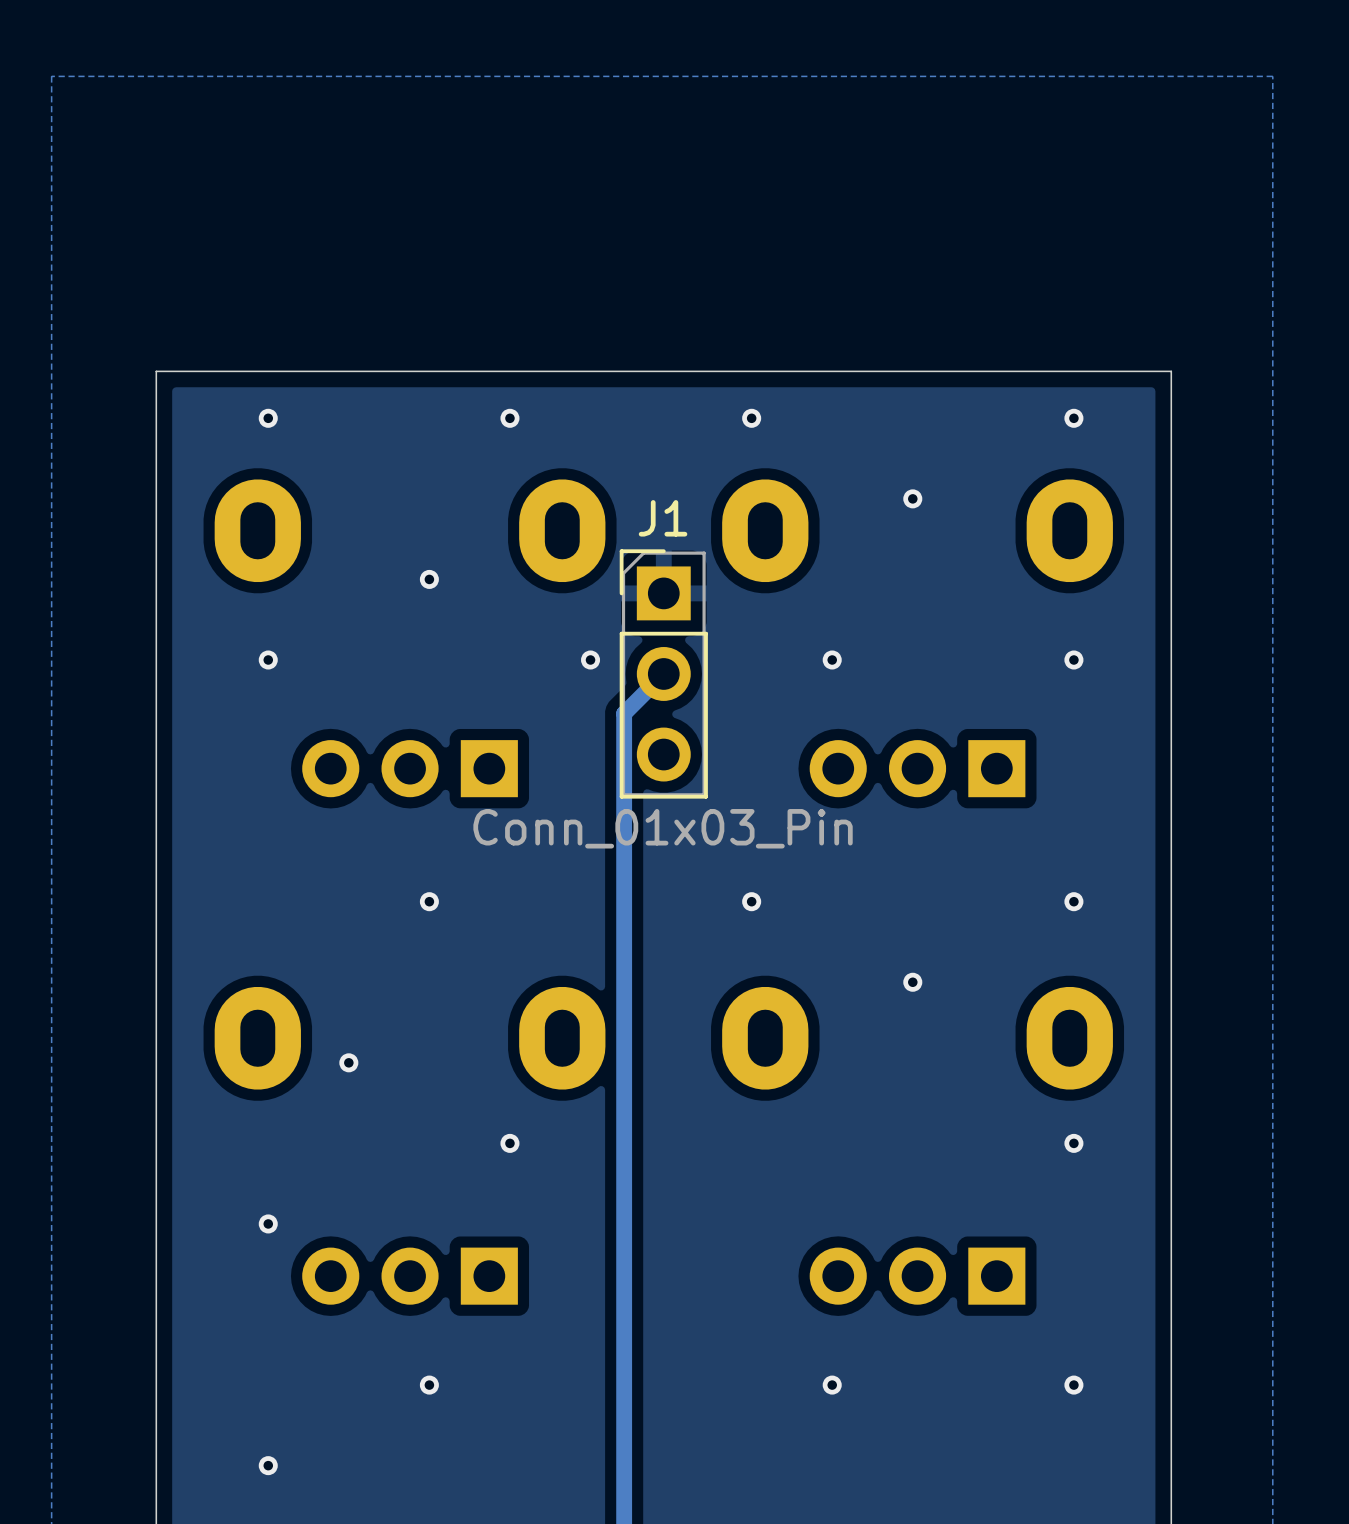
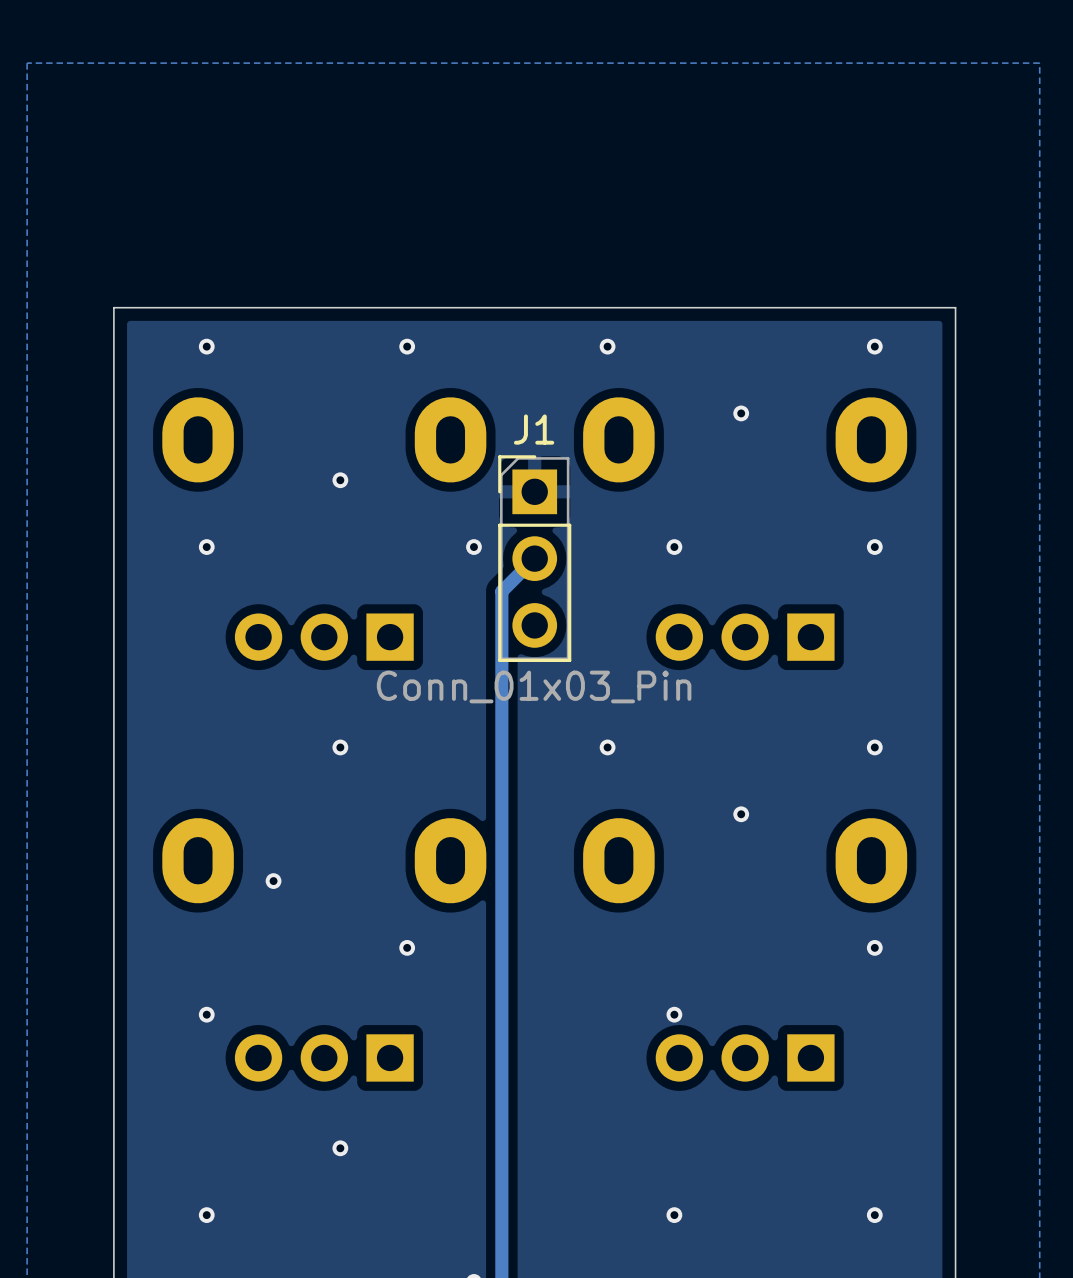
via: none -> (674, 1014)
via: (832, 1385) -> none
via position: (1073, 1385) -> (874, 1215)
via: none -> (674, 1215)

